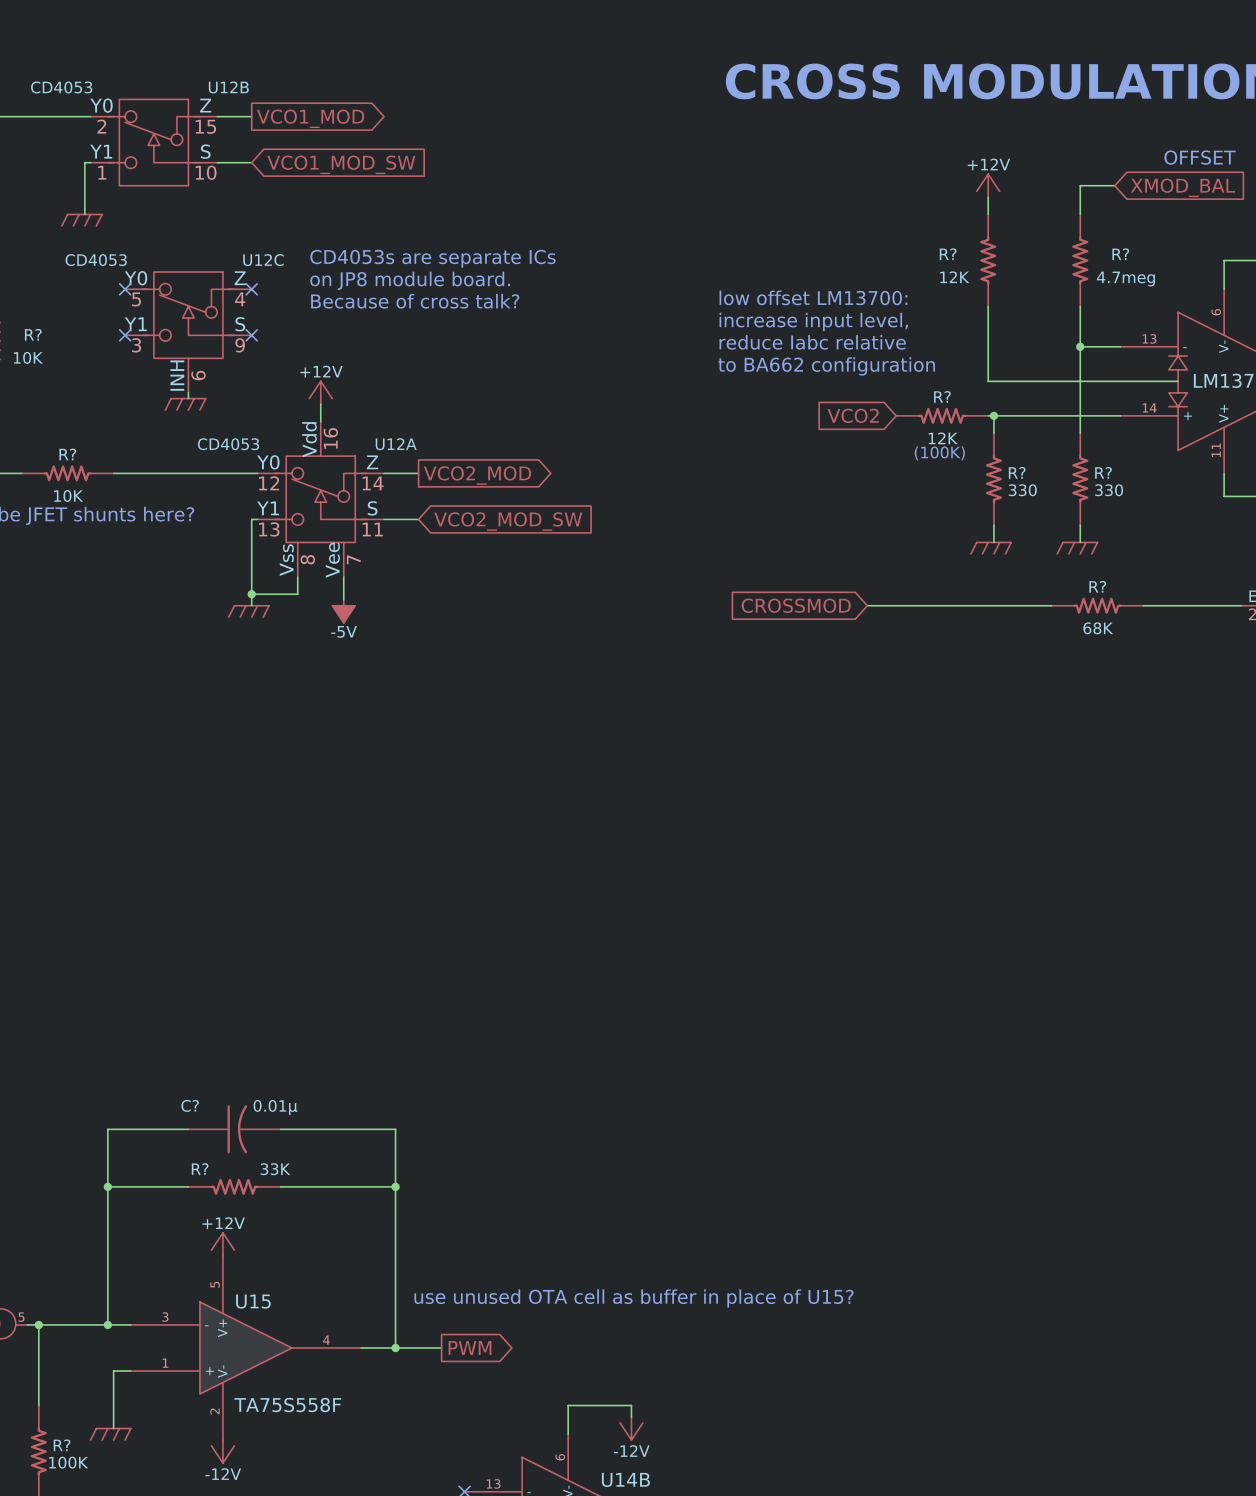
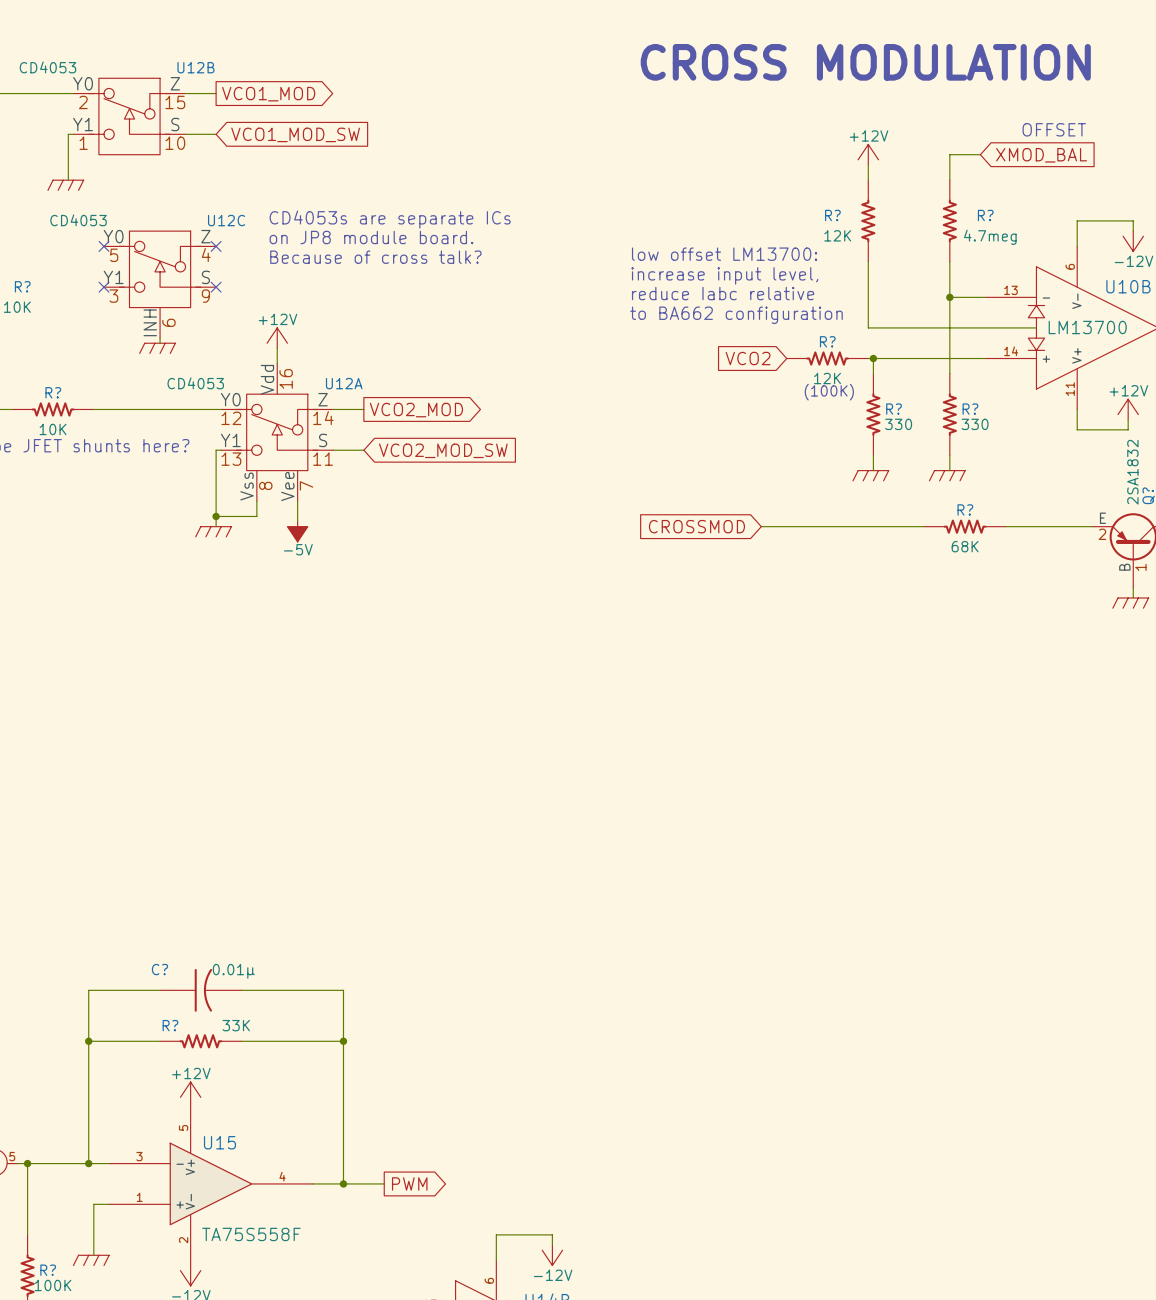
text: use unused OTA cell as buffer in place of U15? (634, 1298) -> none

